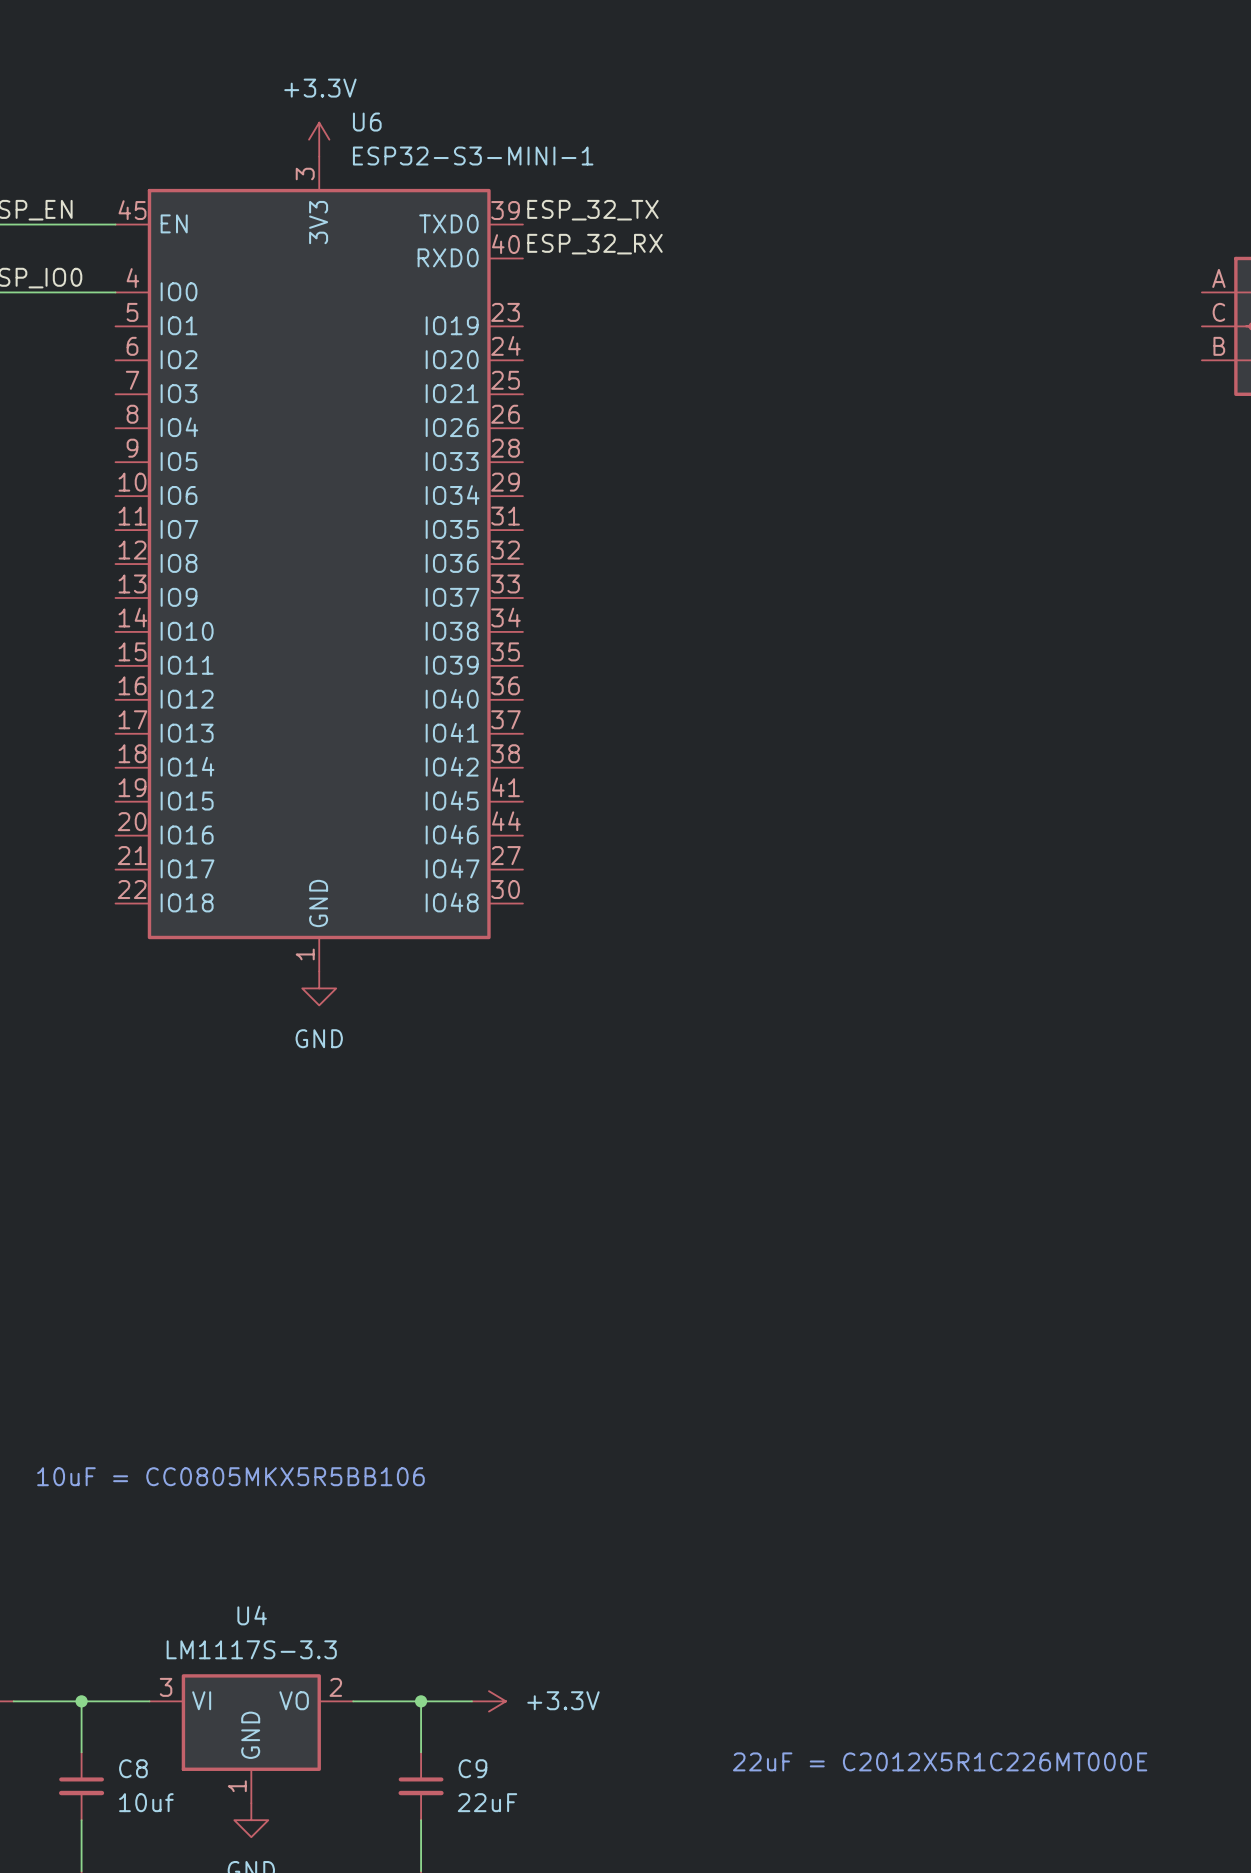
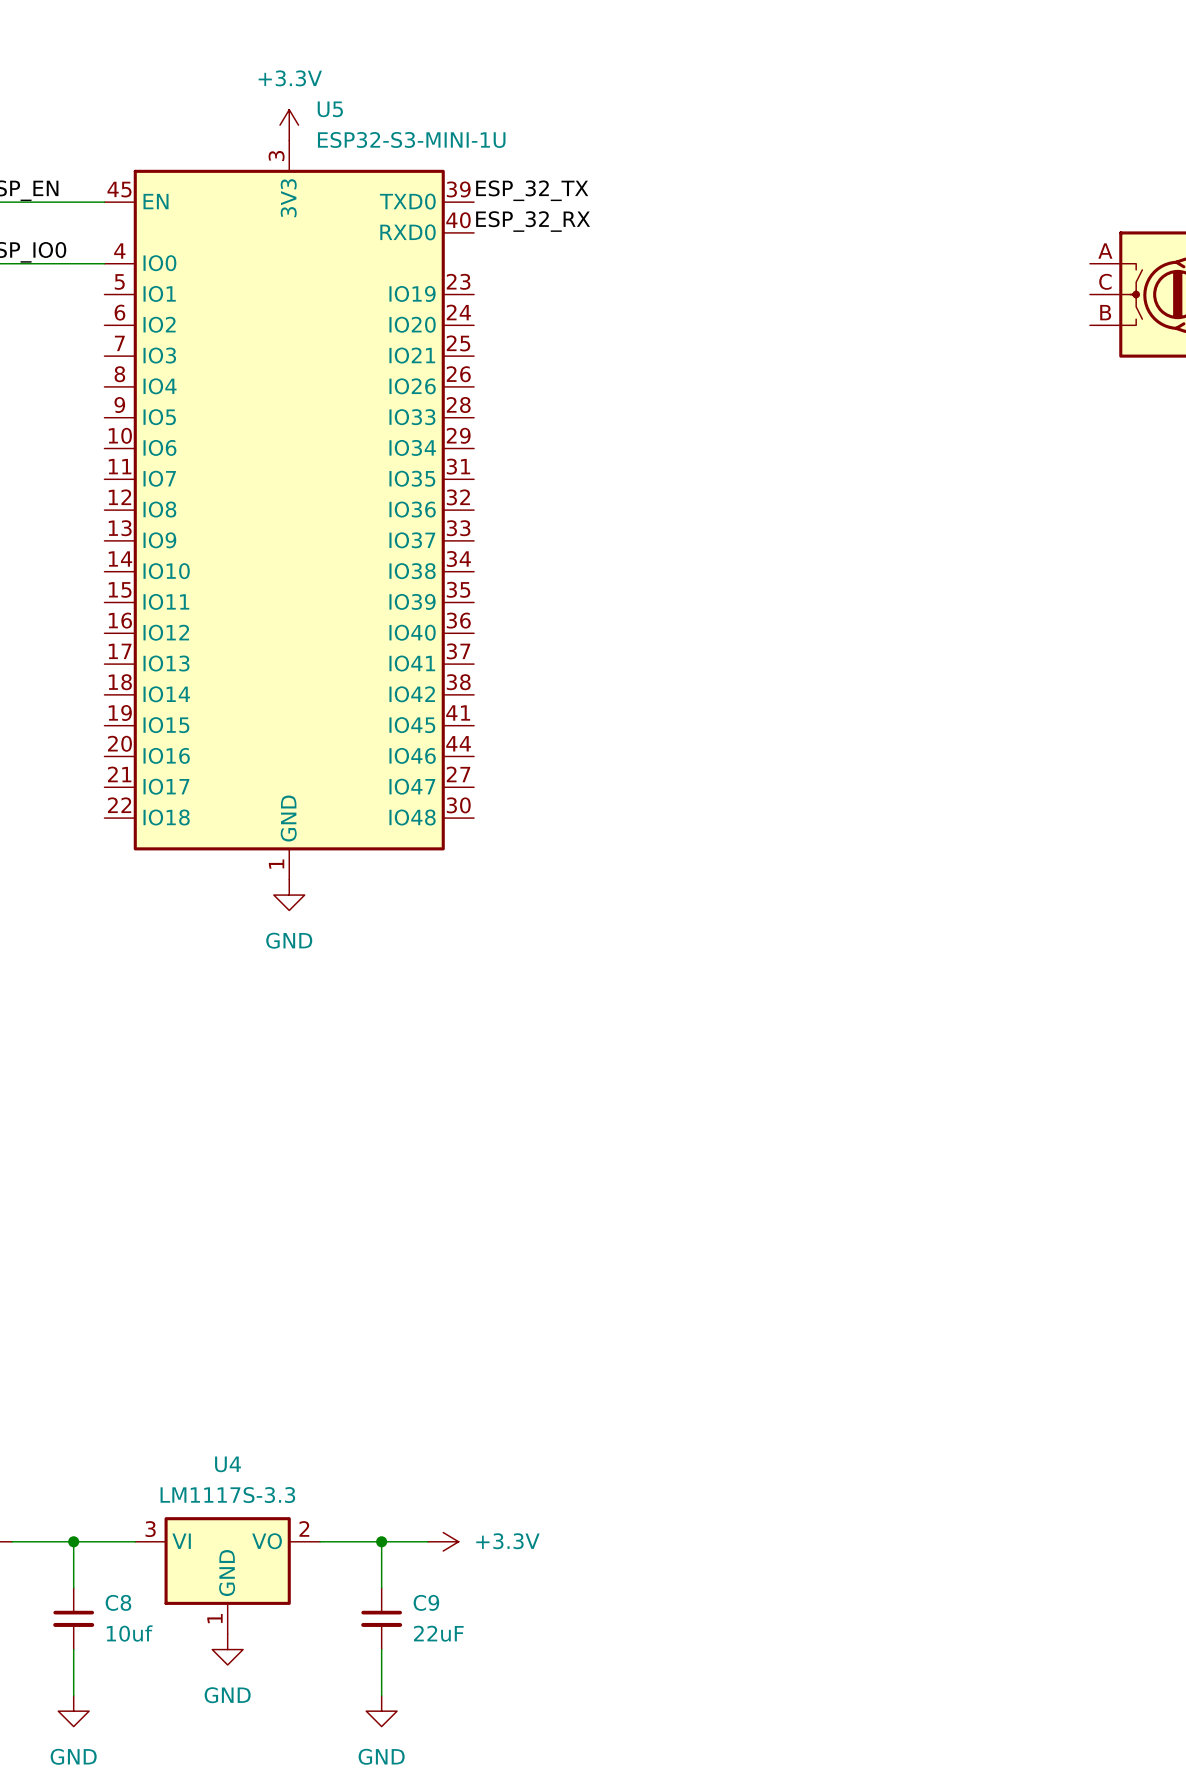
U6 name: U6 (367, 122) -> U5 (330, 109)
U6 value: ESP32-S3-MINI-1 (473, 156) -> ESP32-S3-MINI-1U (411, 139)
text: 10uF = CC0805MKX5R5BB106 (230, 1476) -> none
text: 22uF = C2012X5R1C226MT000E (940, 1761) -> none

